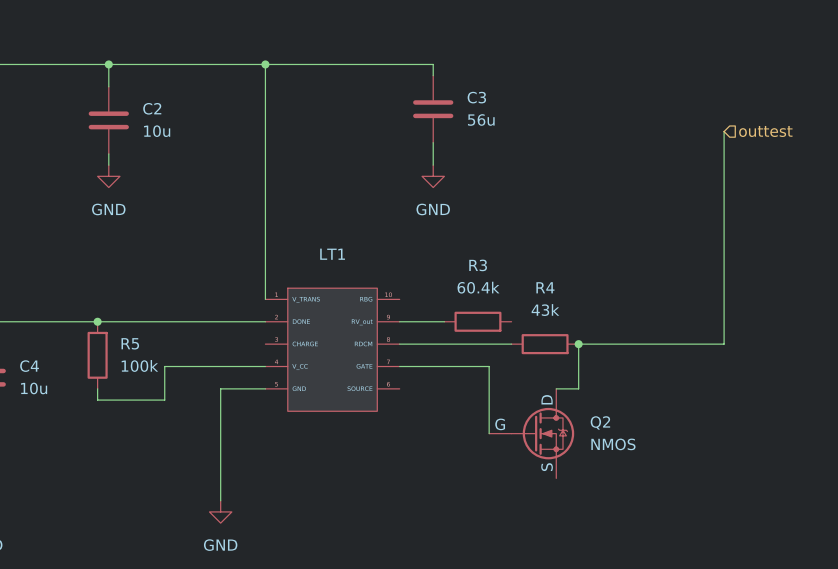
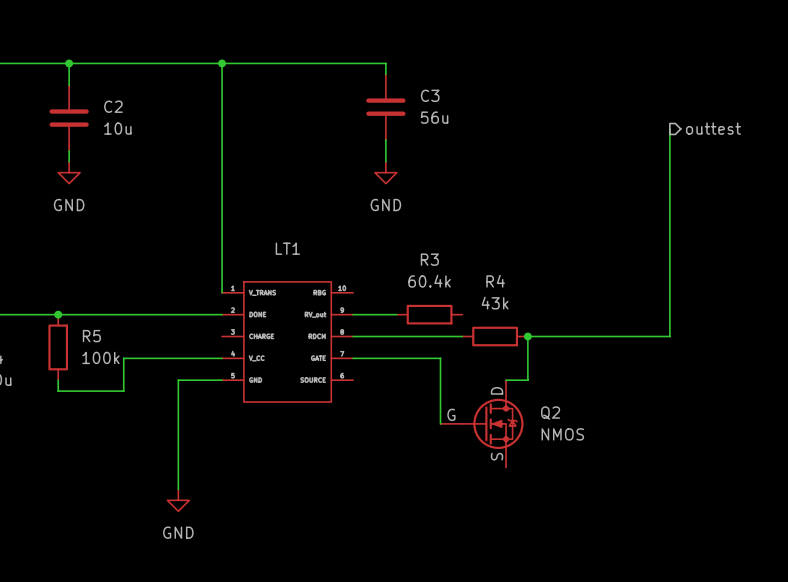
hierarchical label shape: input (765, 131) -> output (713, 128)

